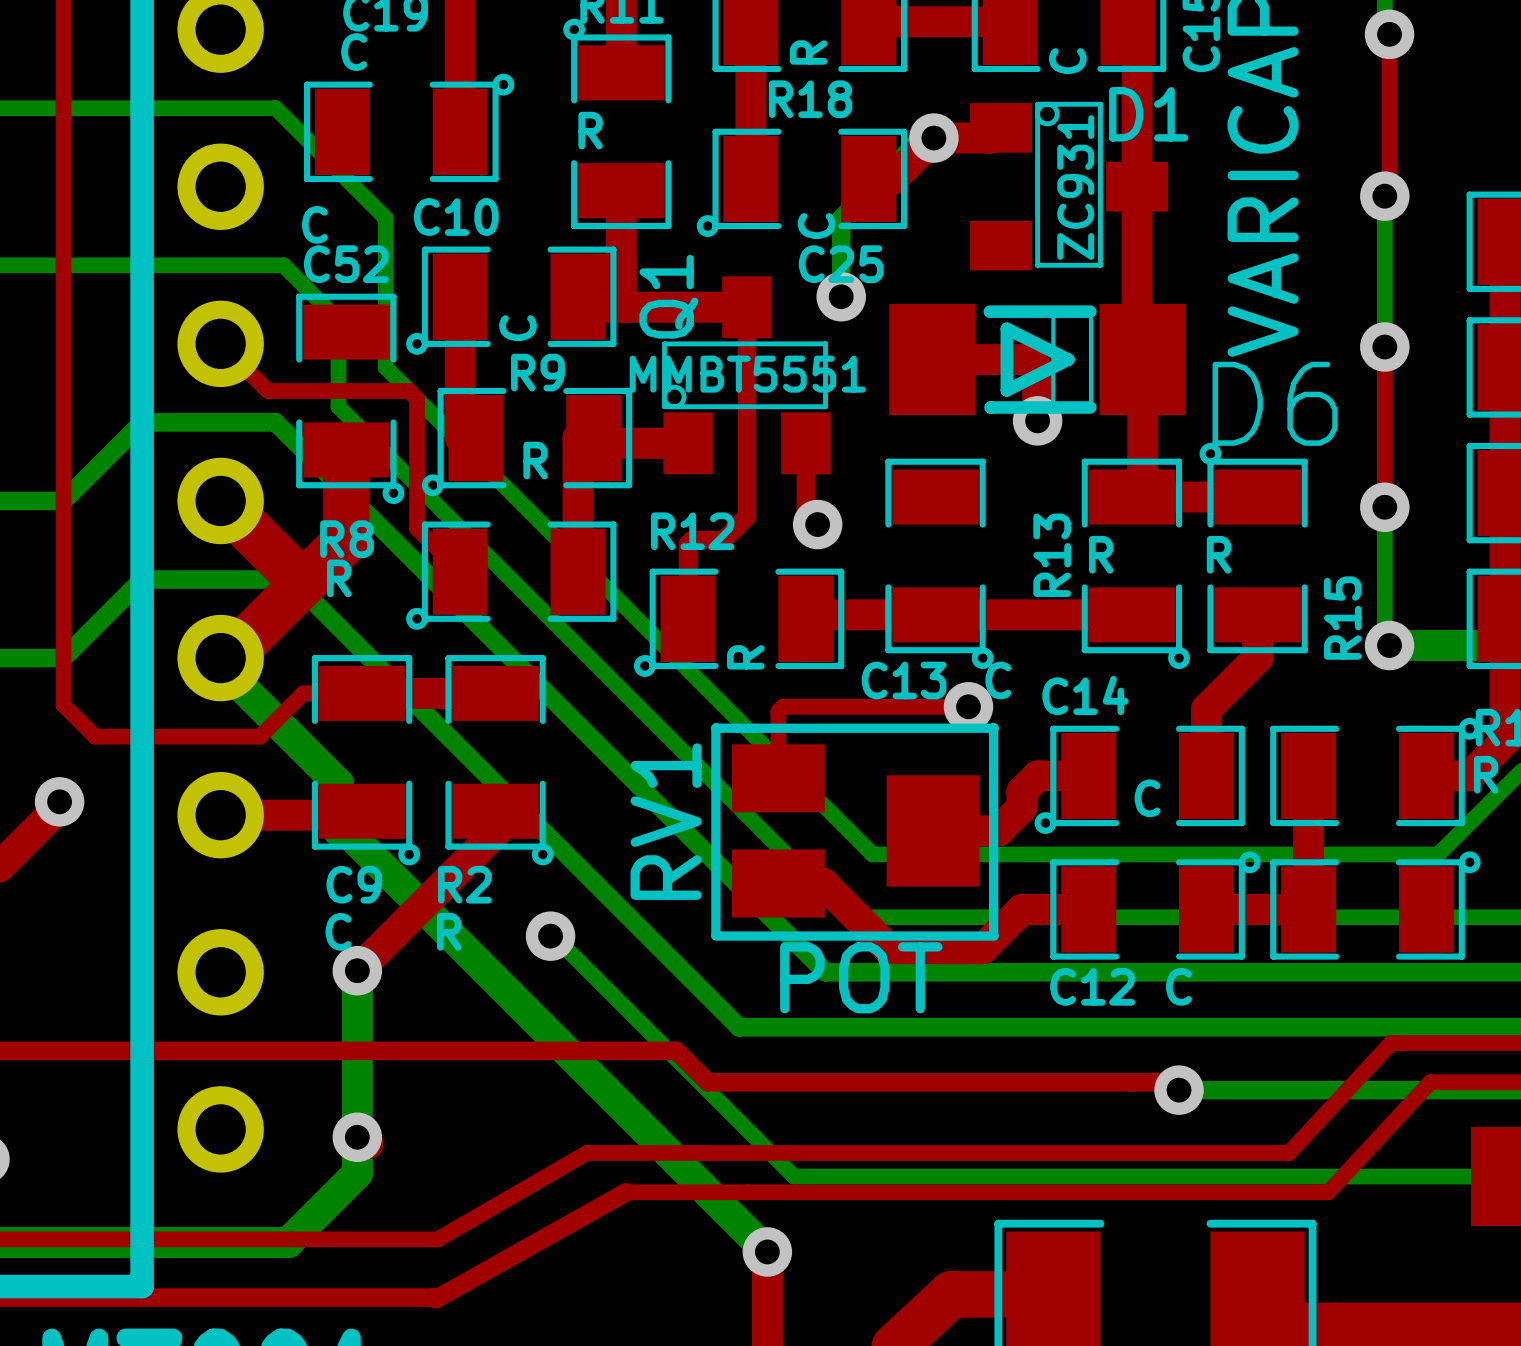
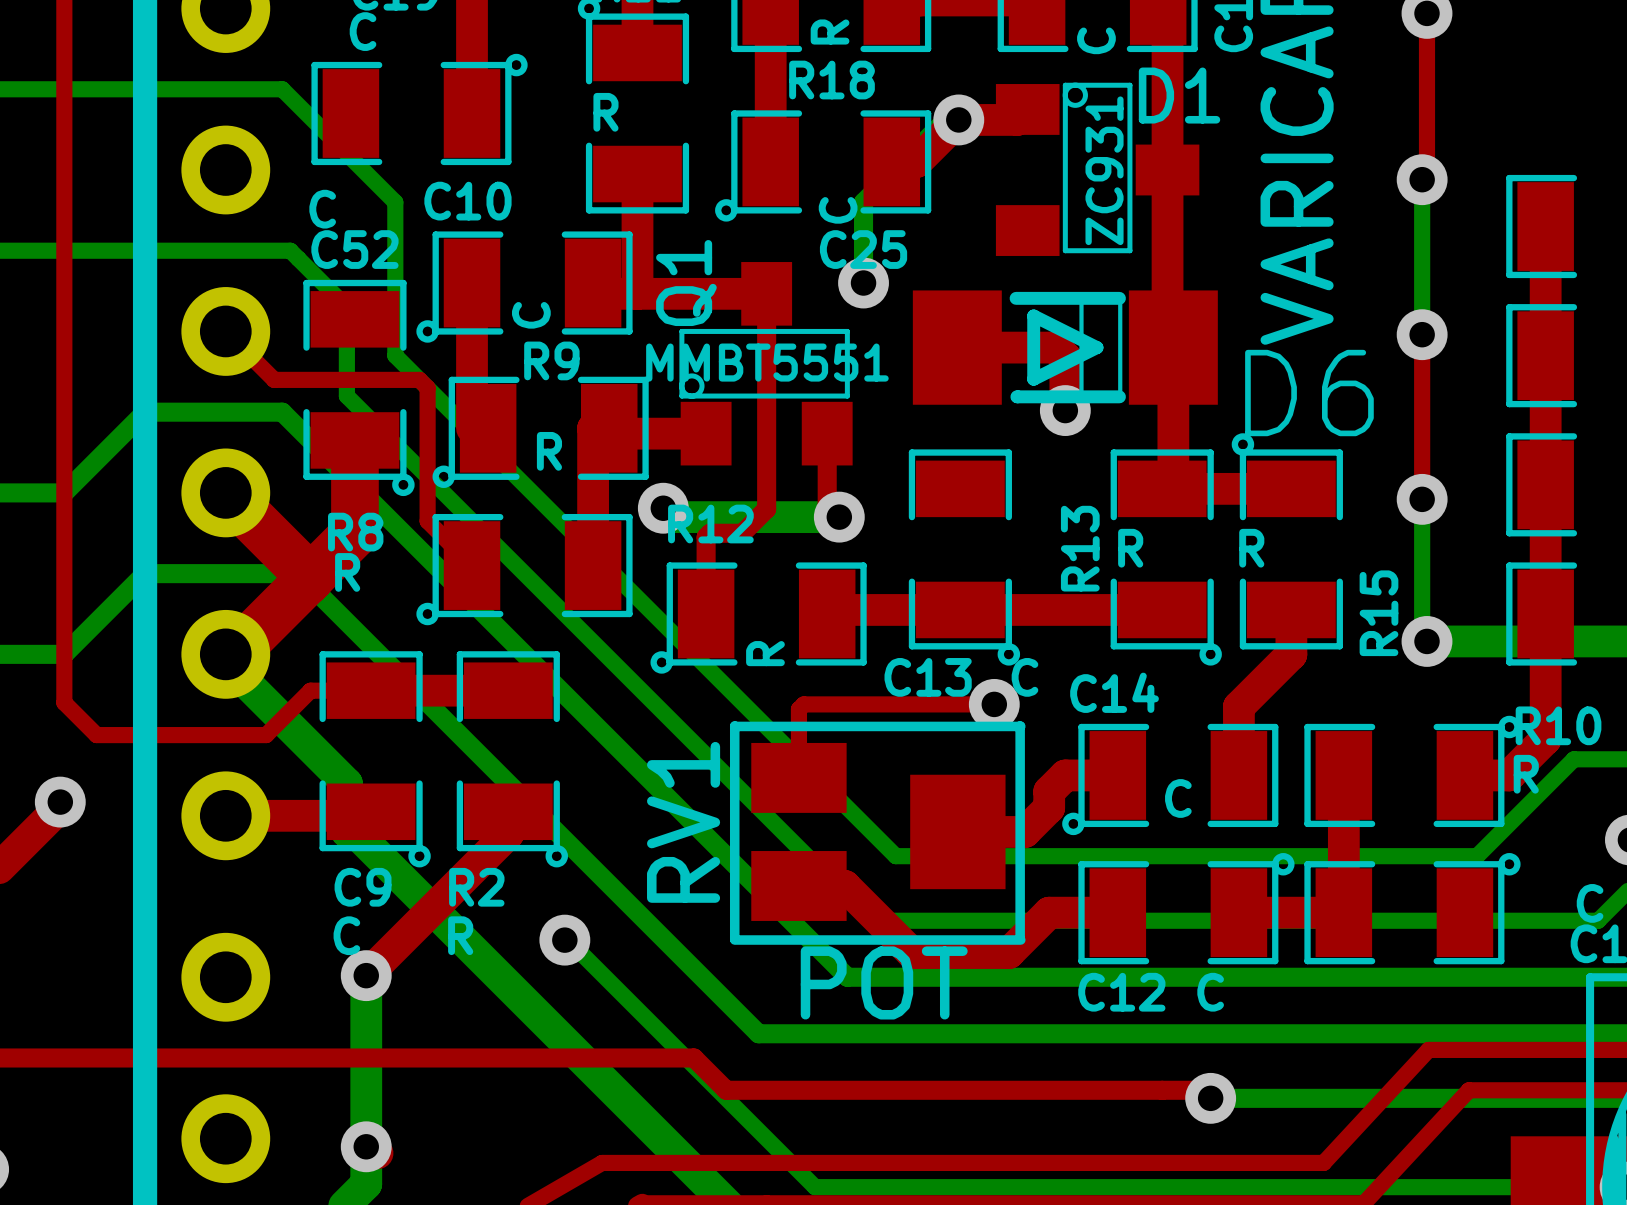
bottom track: none -> (663, 508) (672, 517) (839, 517)
via: none -> (663, 508)

